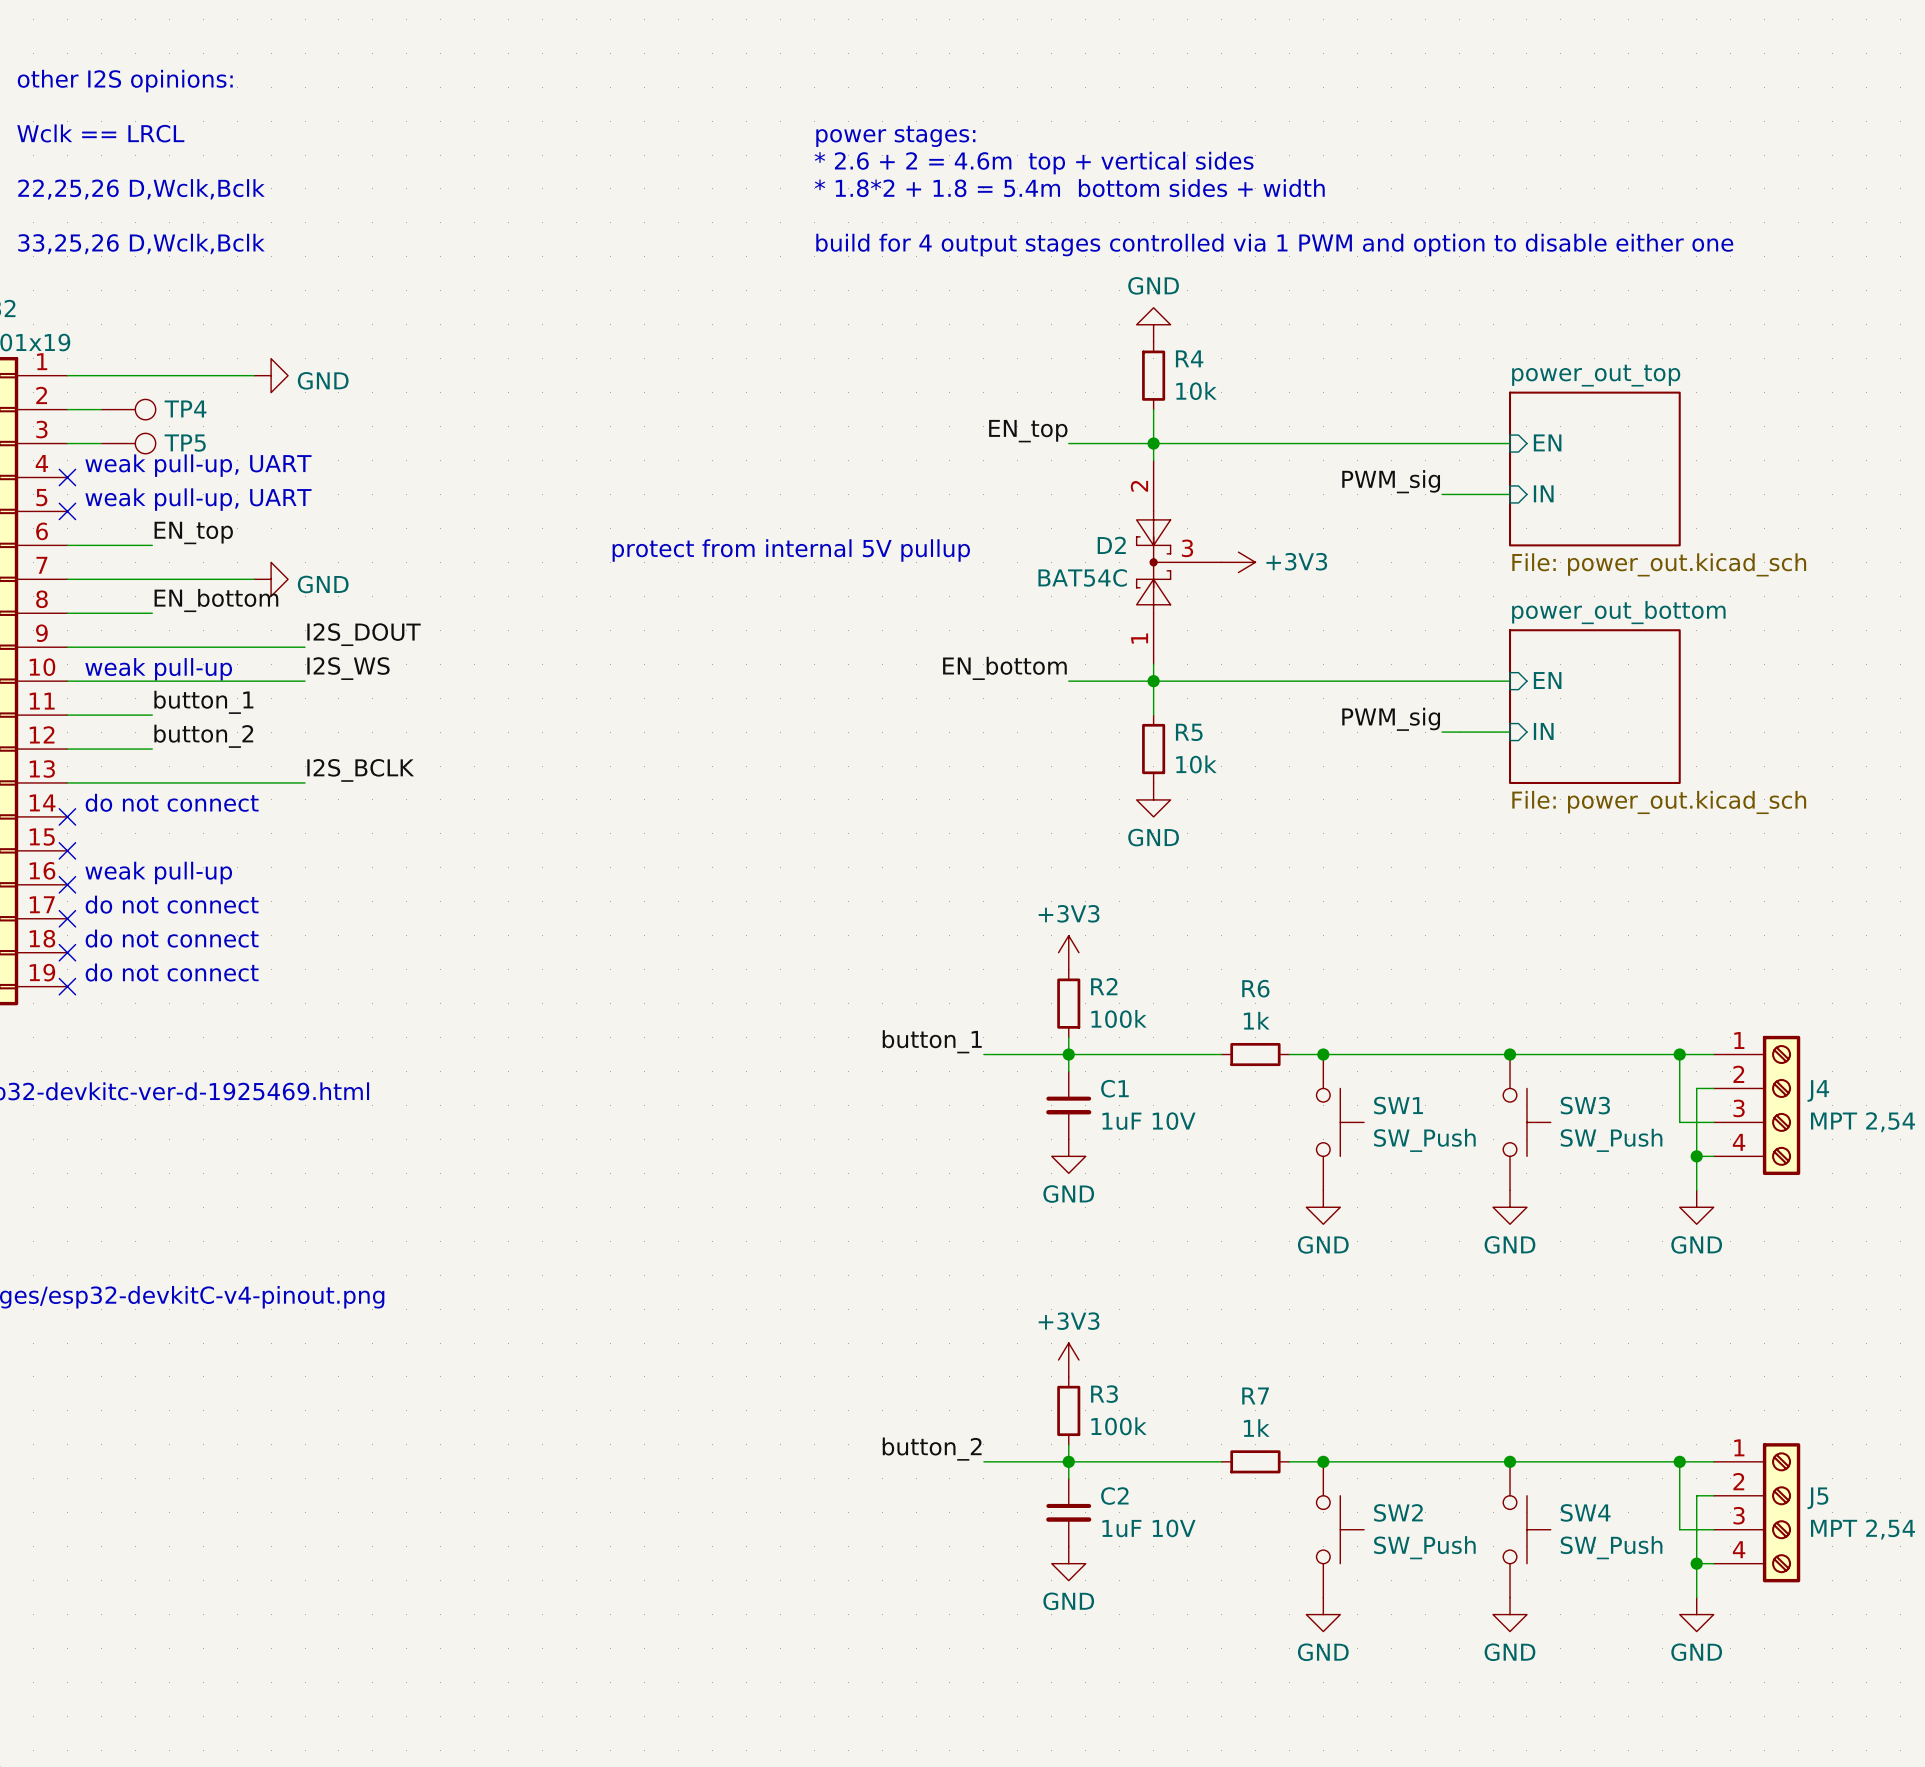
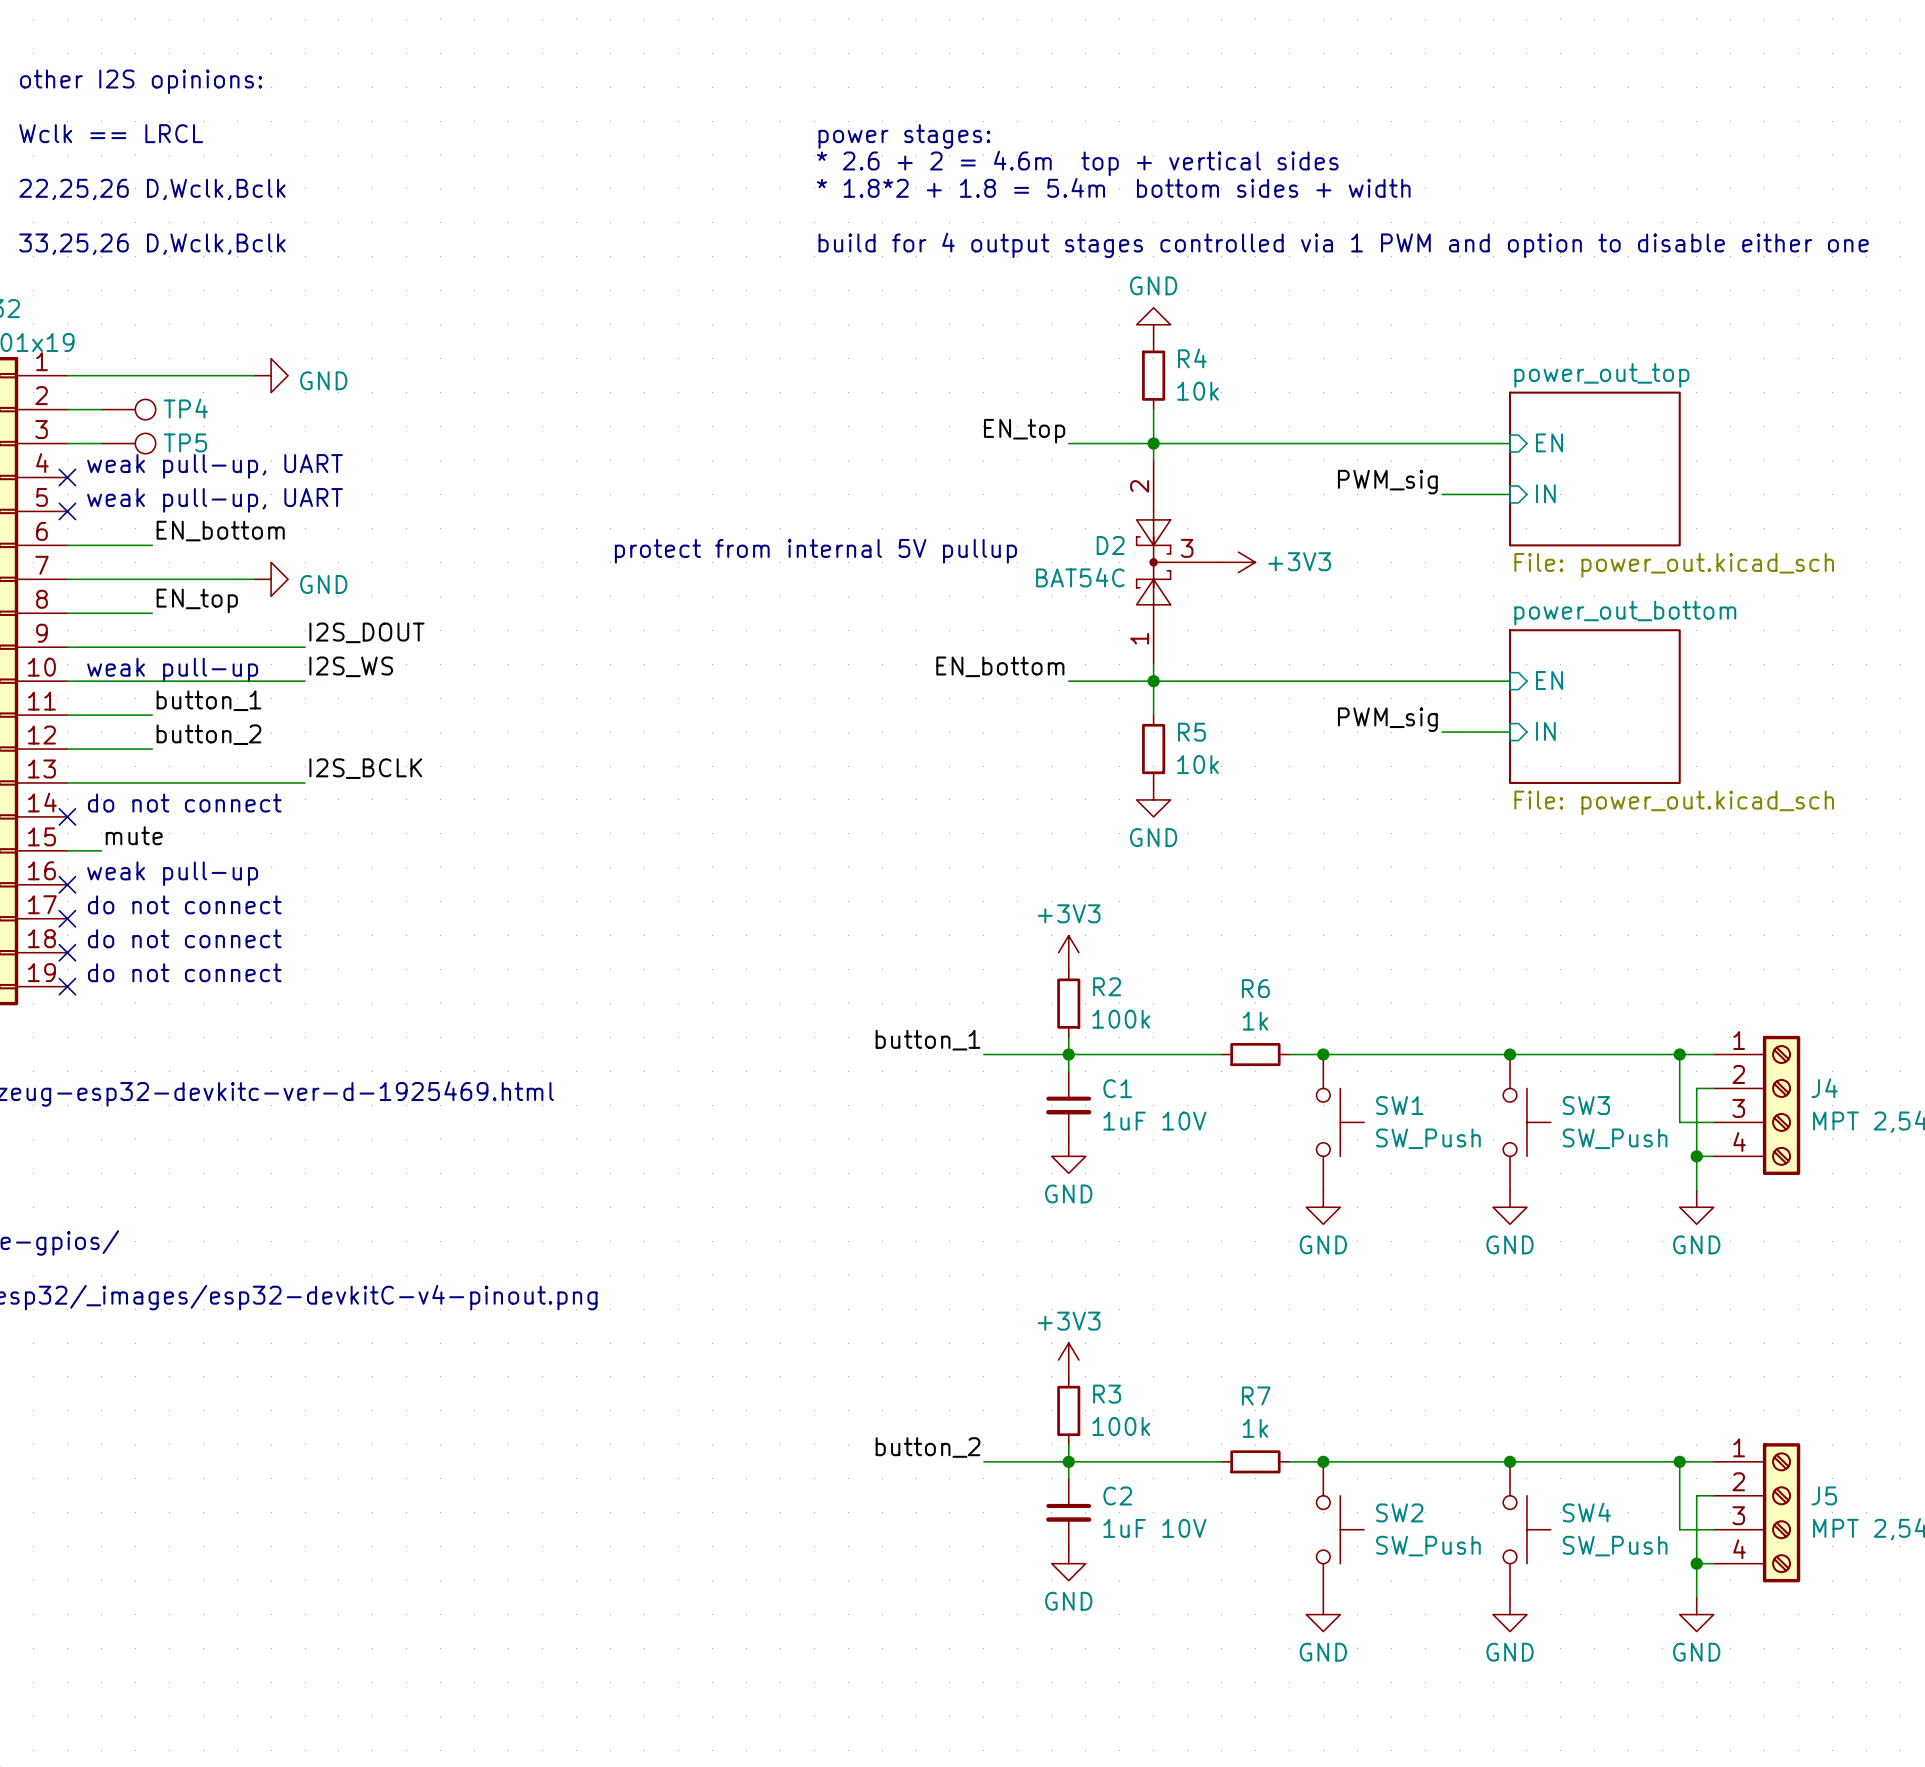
label: EN_top (193, 532) -> EN_bottom (220, 531)
label: EN_bottom (216, 600) -> EN_top (197, 600)
label: none -> mute (134, 835)
wire: none -> (67, 850) (101, 850)
no-connect mark: (67, 850) -> none

